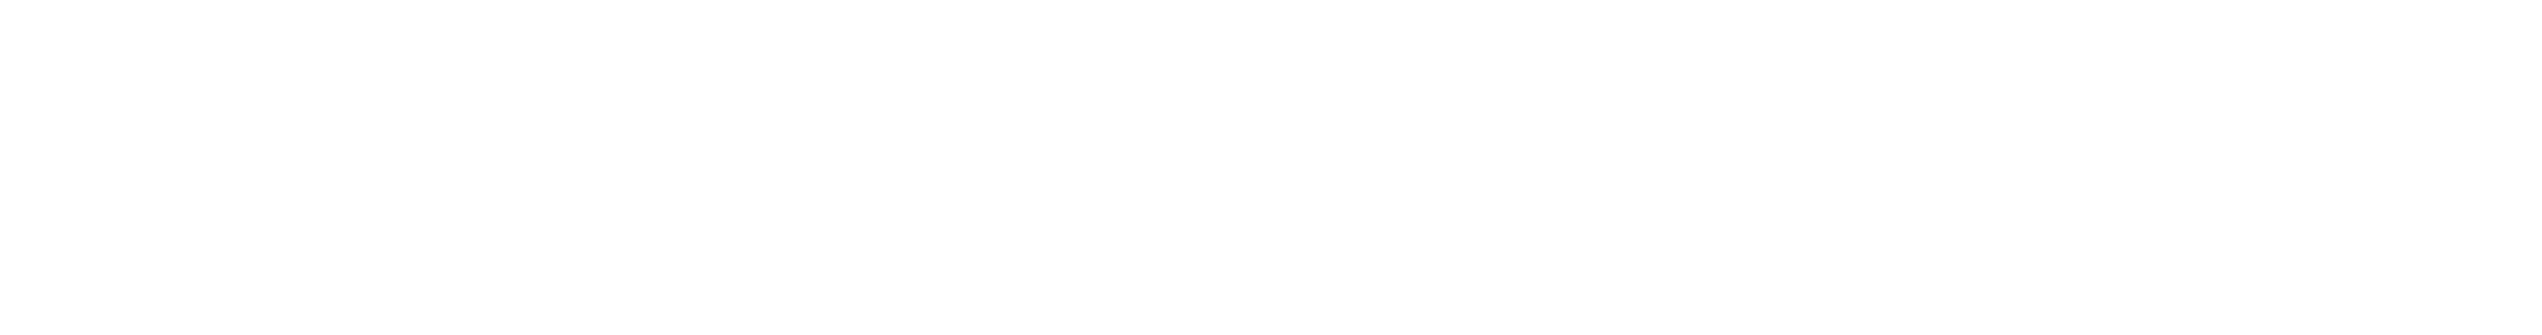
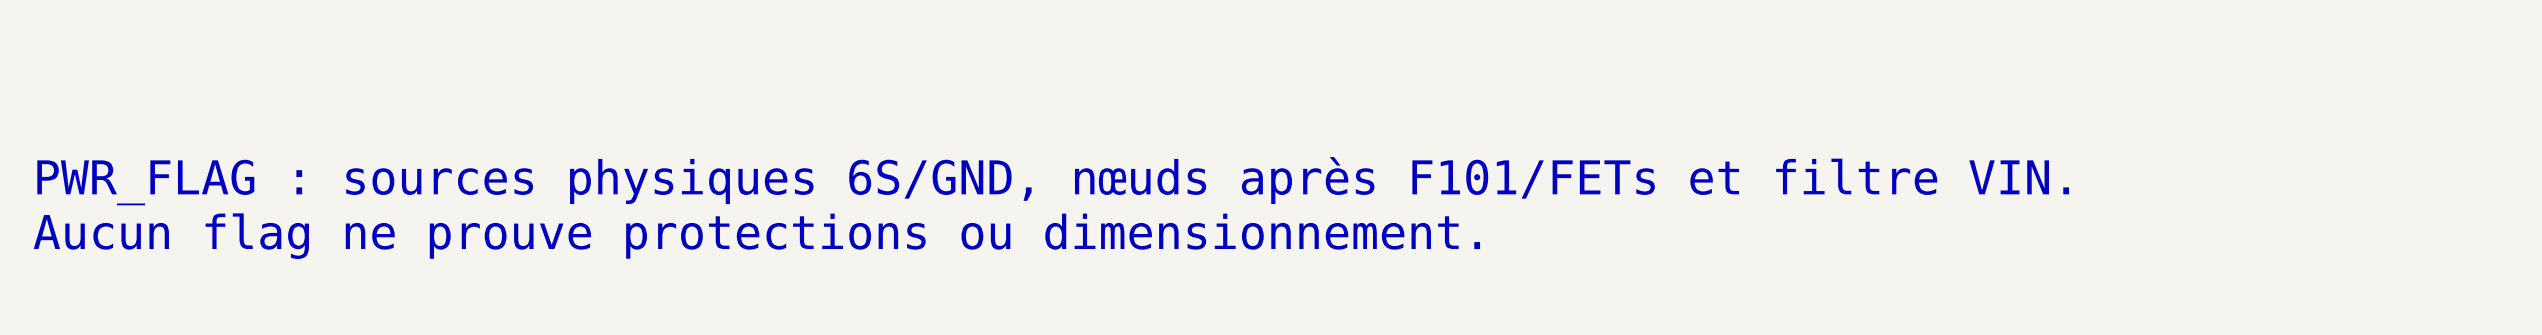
text: none -> PWR_FLAG : sources physiques 6S/GND, nœuds après F101/FETs et filtre VIN. (1053, 181)
text: none -> Aucun flag ne prouve protections ou dimensionnement. (756, 236)

